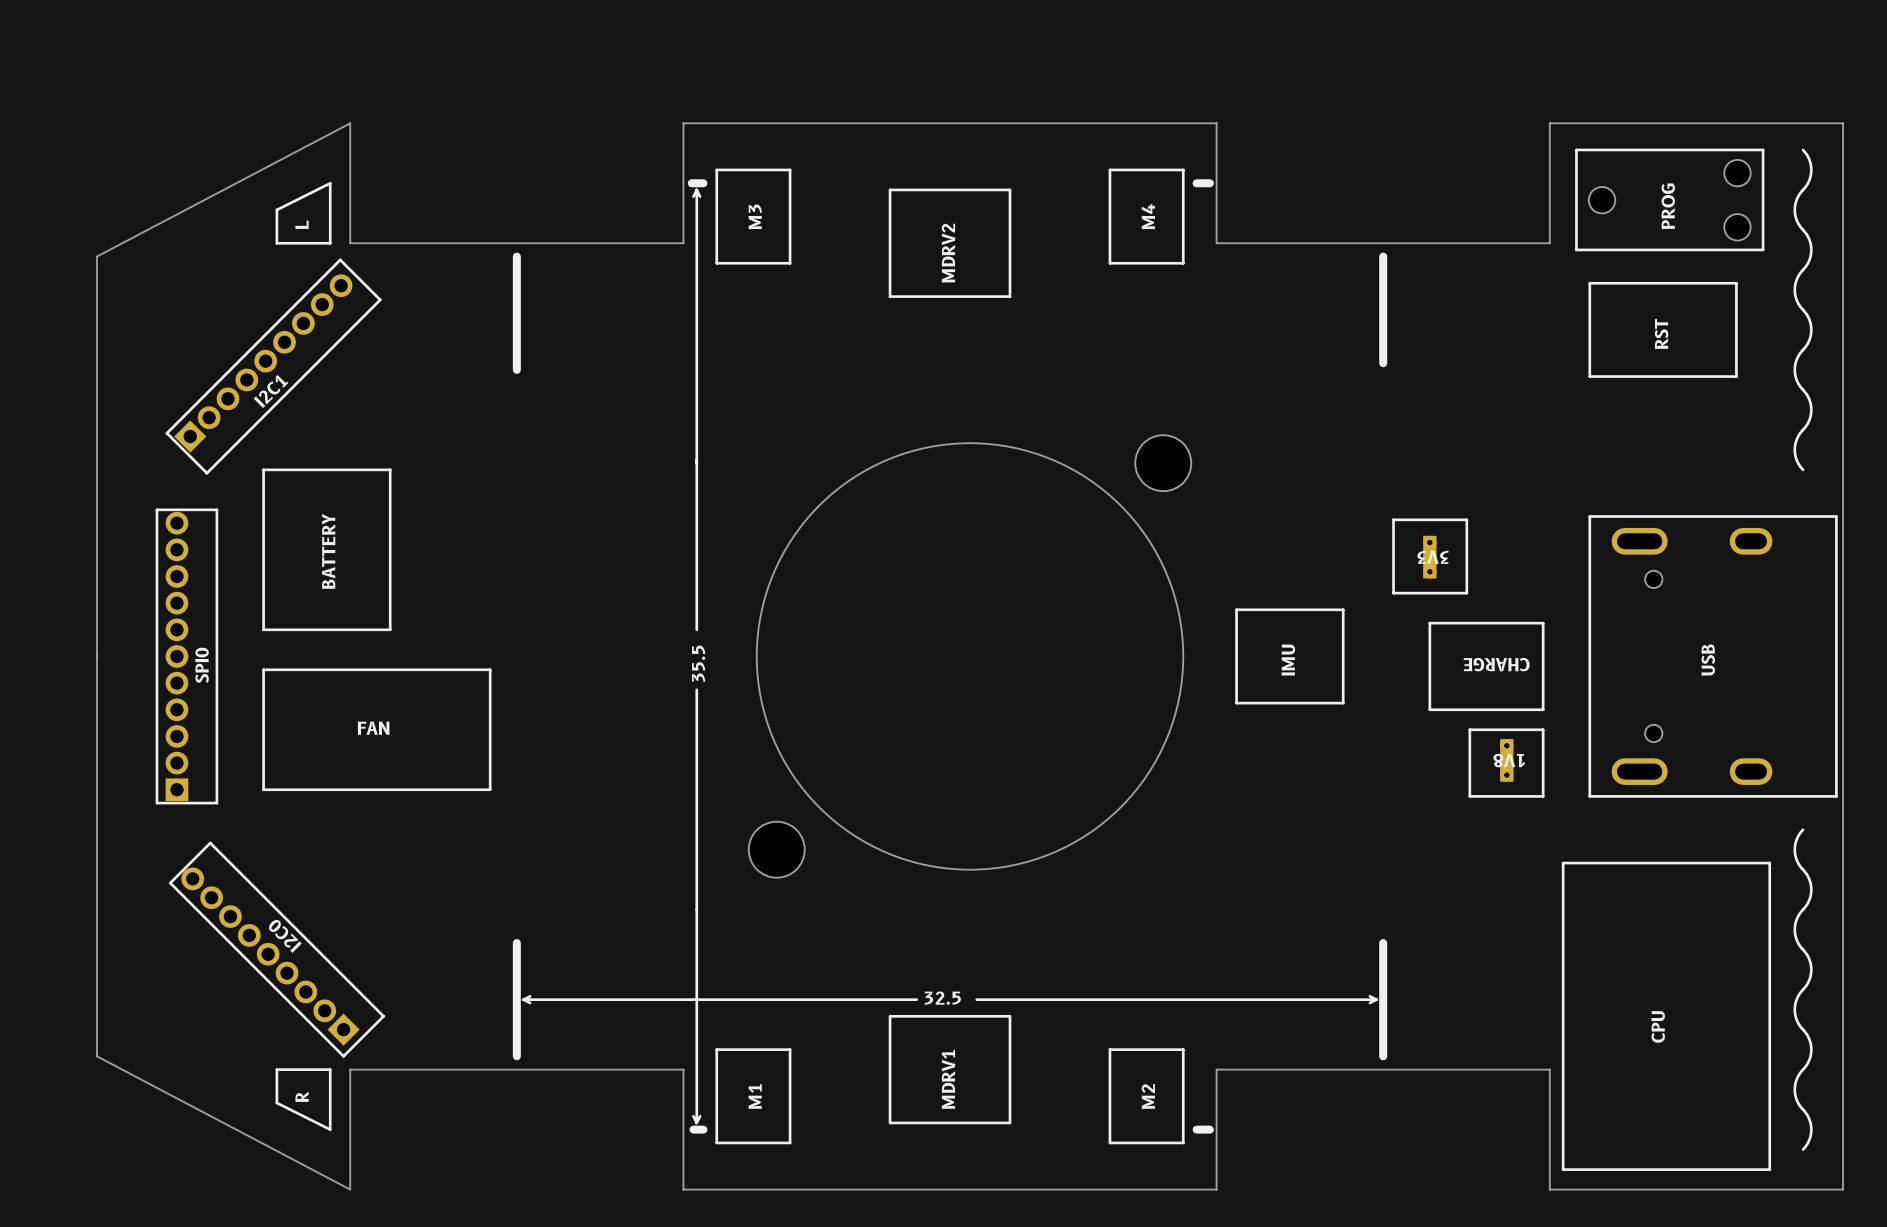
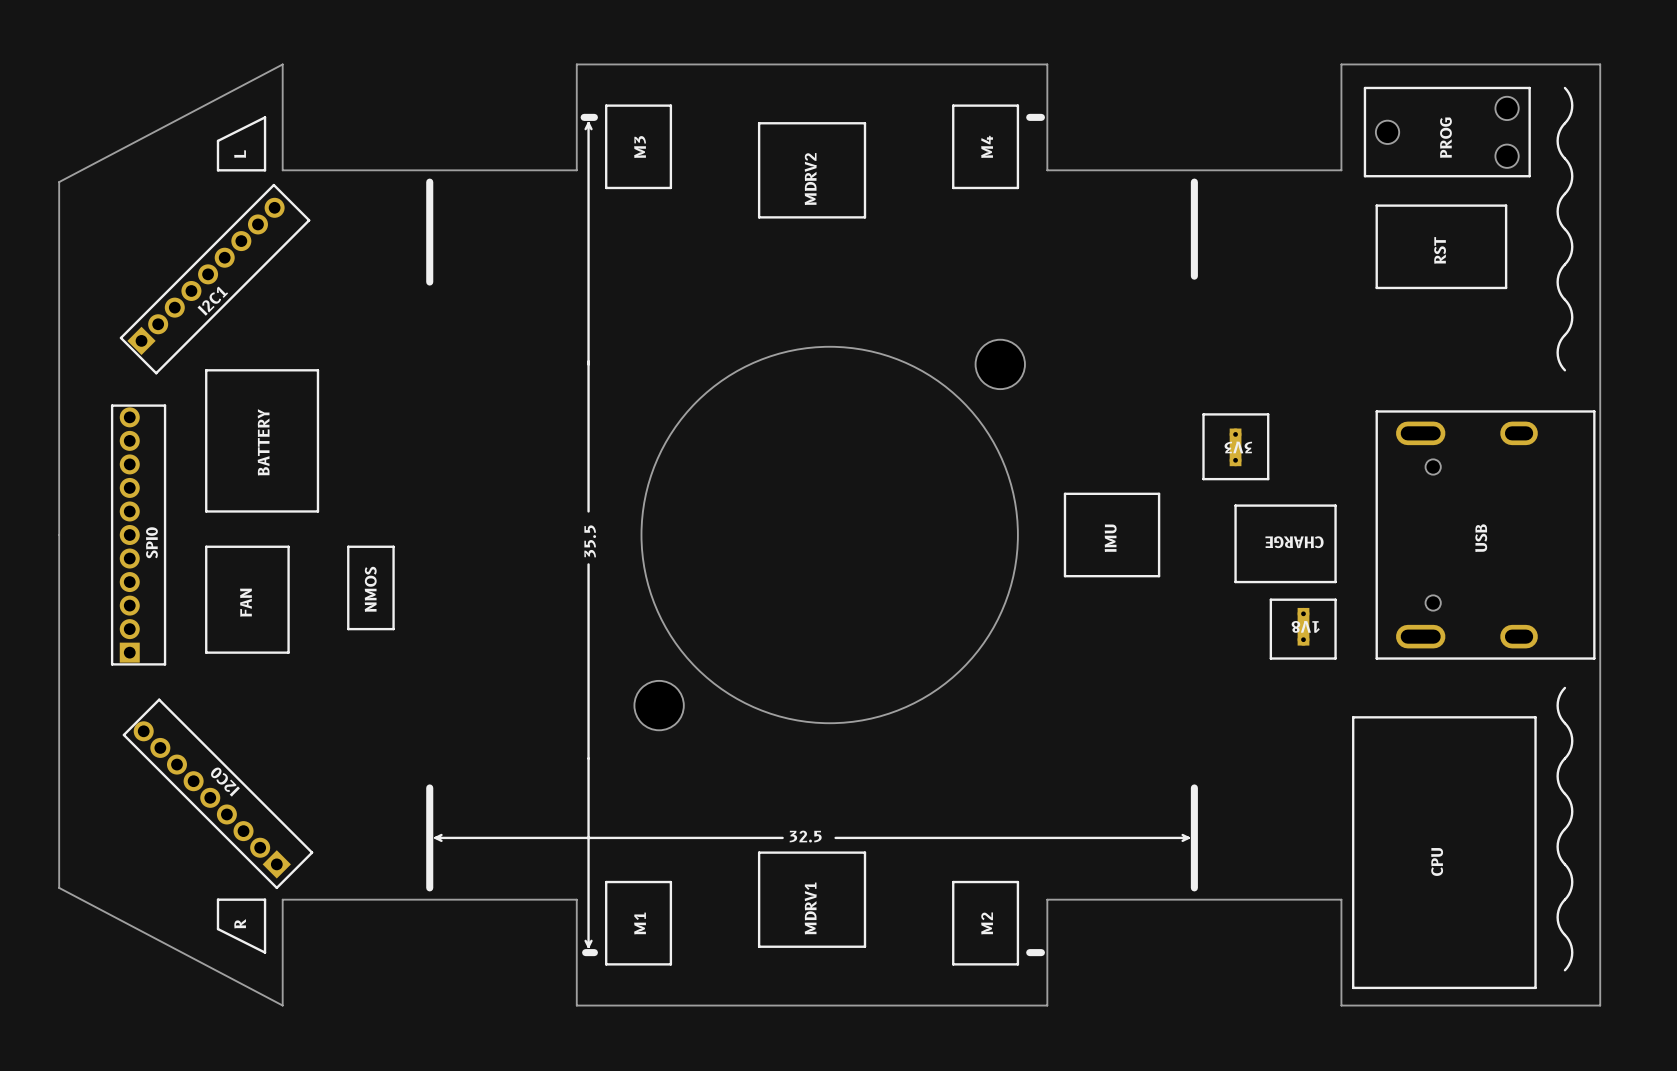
line: (424, 669) (356, 669) -> (348, 546) (348, 629) (393, 629) (393, 546)
line: (475, 669) (490, 669) (490, 789) (356, 789) -> (288, 546) (288, 652)
text: none -> NMOS (370, 589)
text rotation: 0° (373, 728) -> 90° counterclockwise (245, 602)
text position: FAN (373, 728) -> FAN (245, 602)

